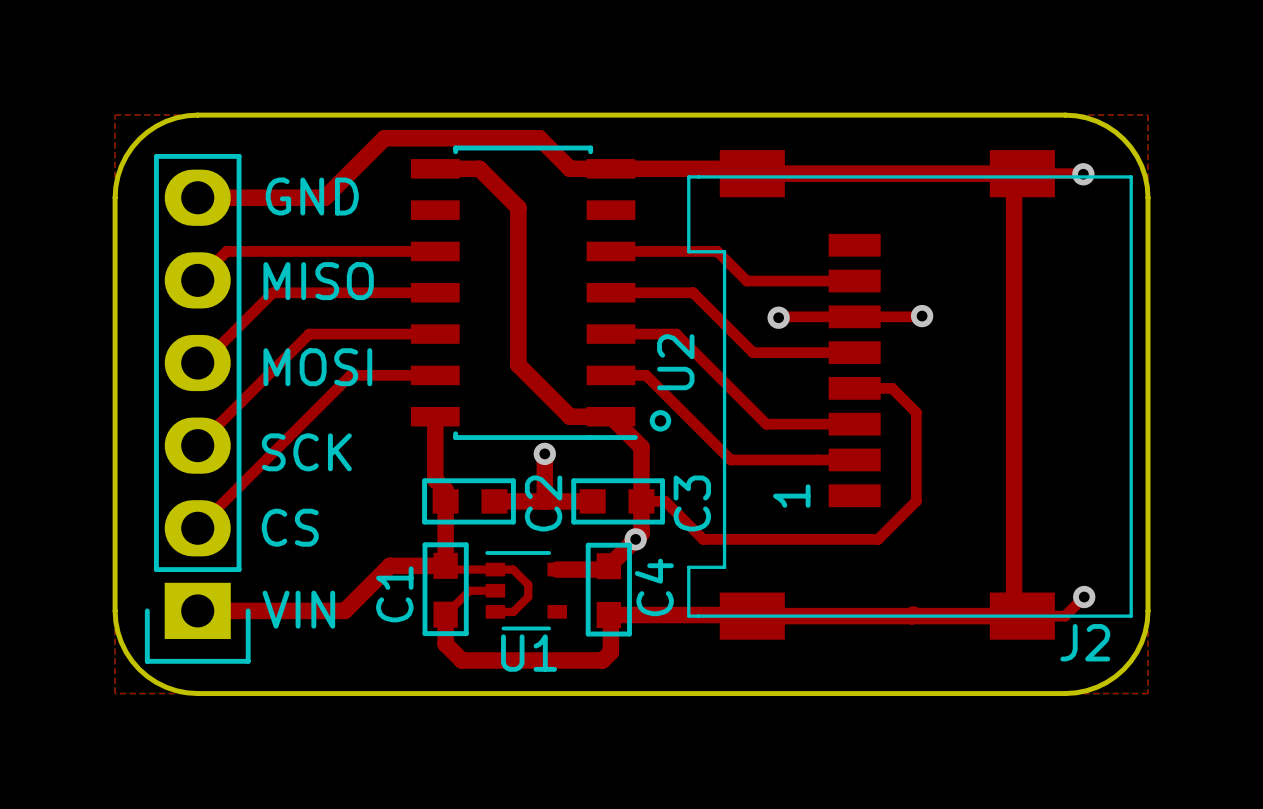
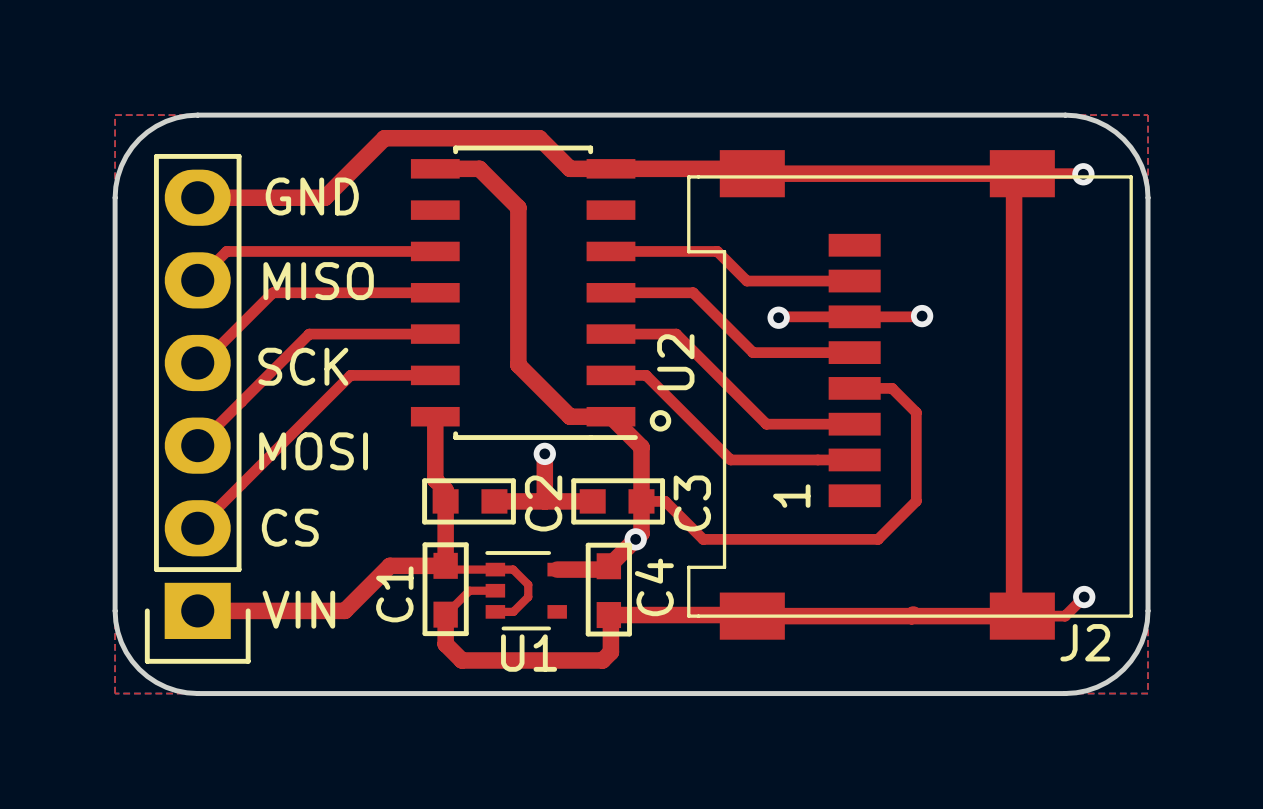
text position: MOSI (317, 367) -> MOSI (313, 451)
text position: SCK (306, 452) -> SCK (303, 366)

